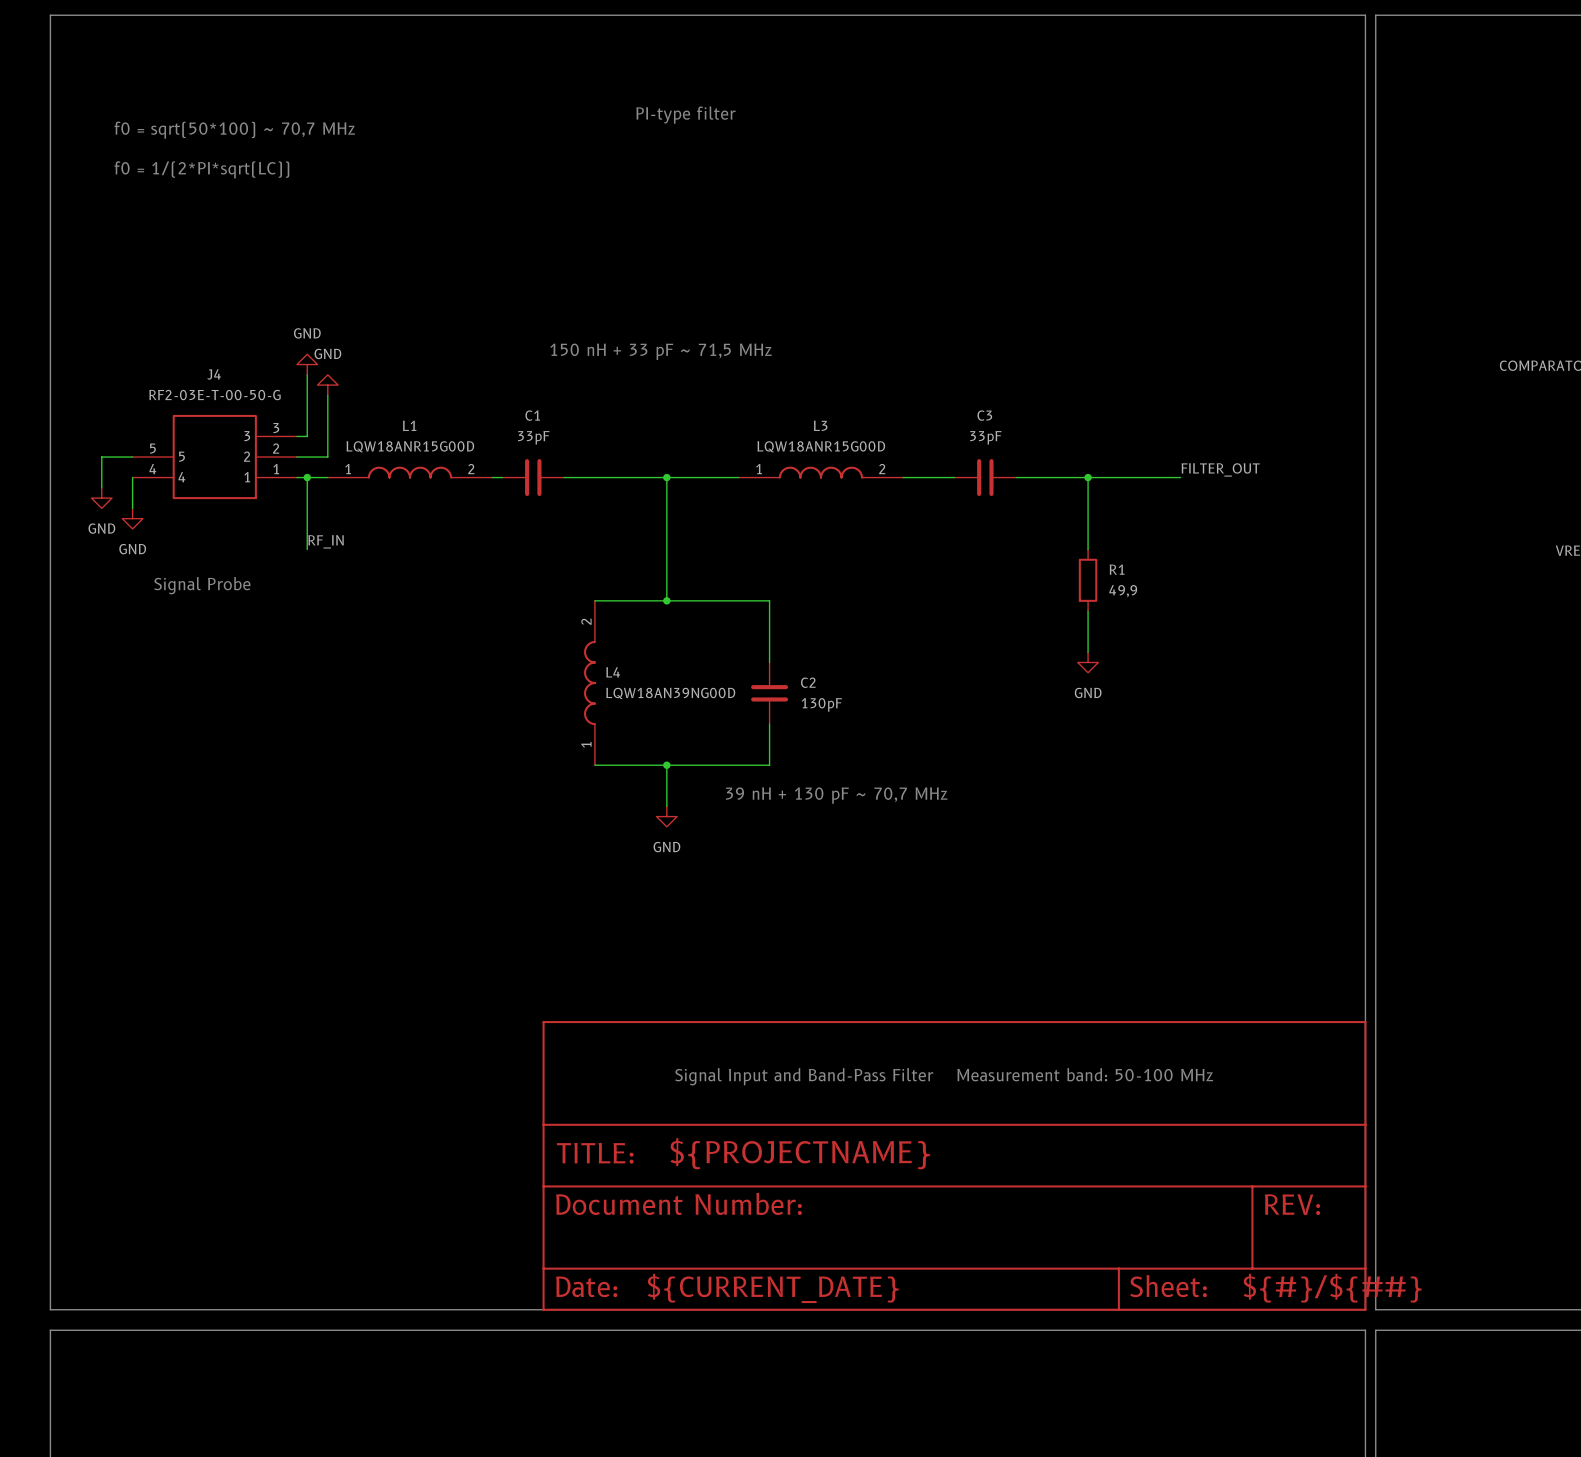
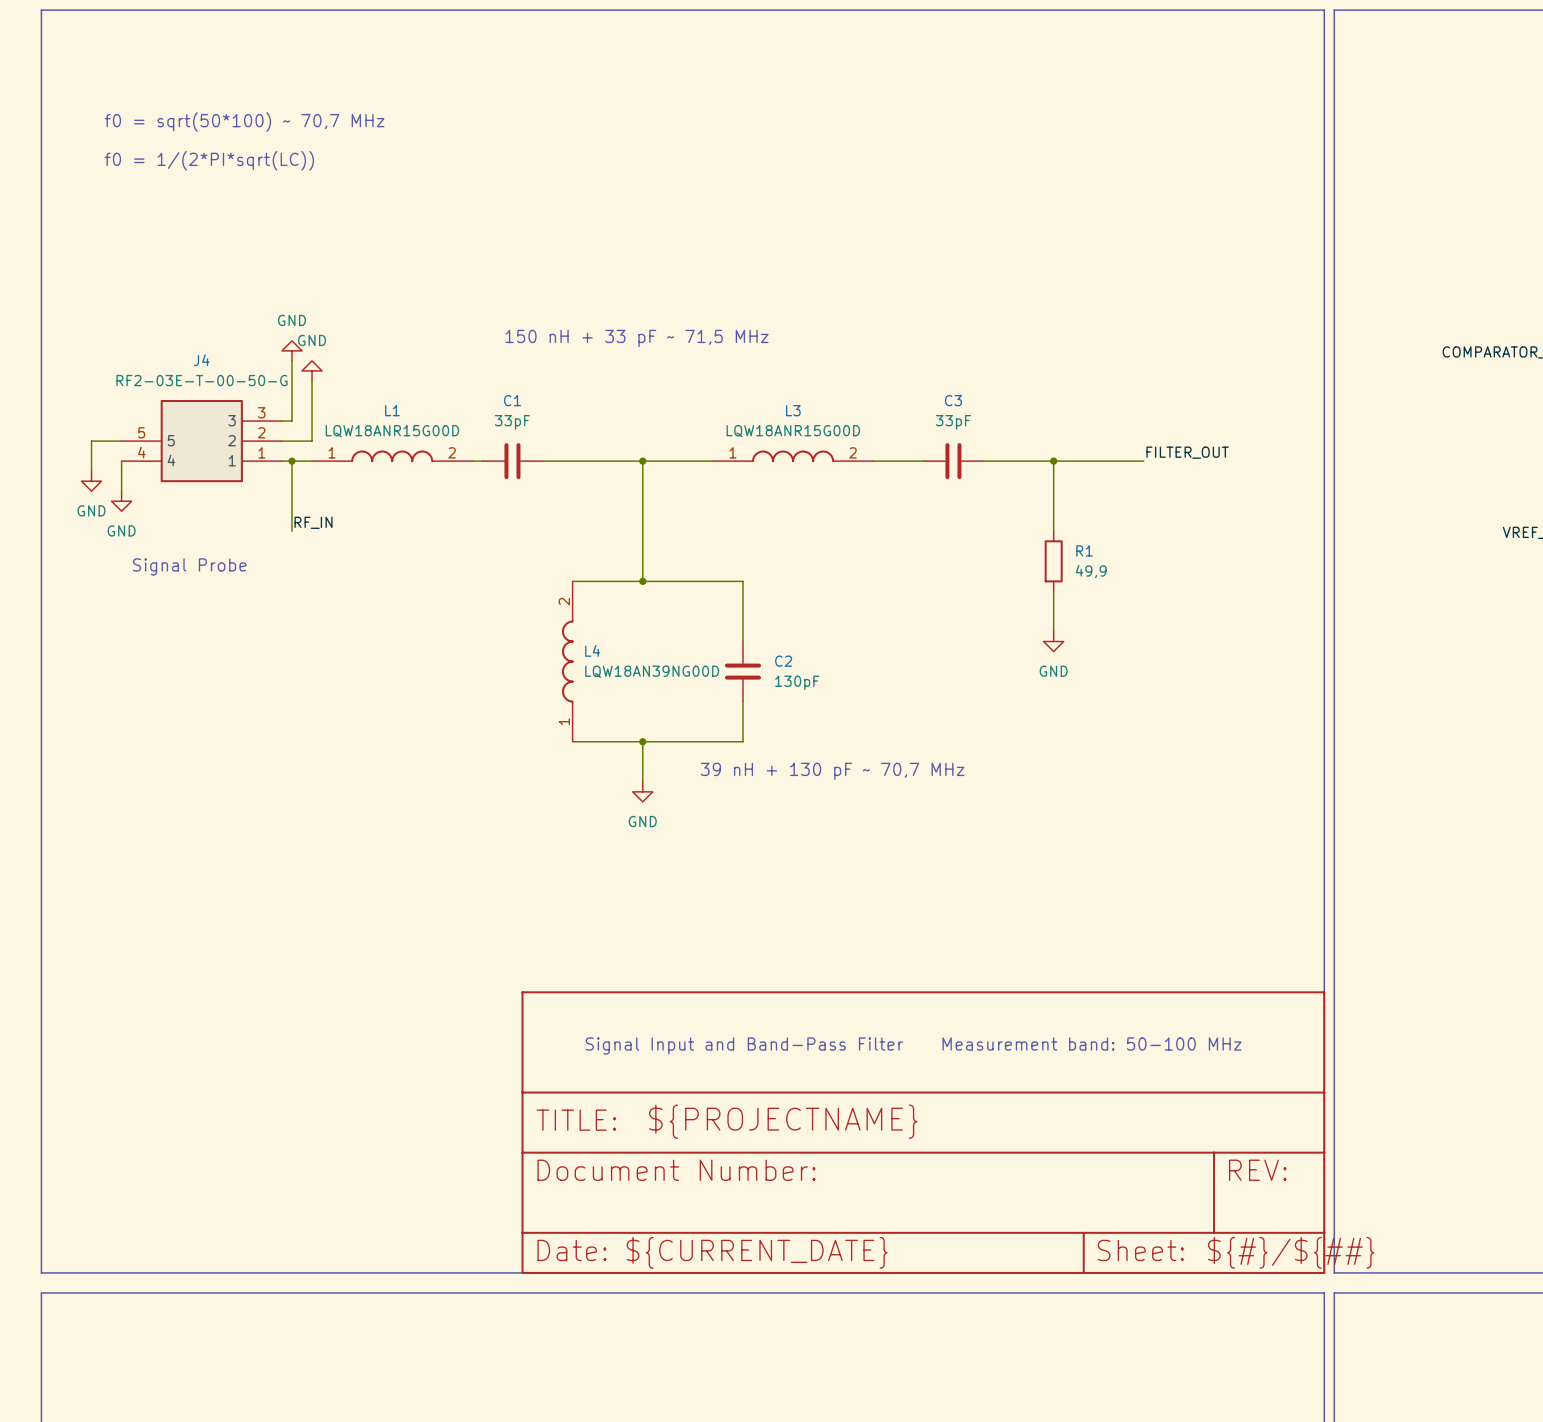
text: PI-type filter (685, 115) -> none

